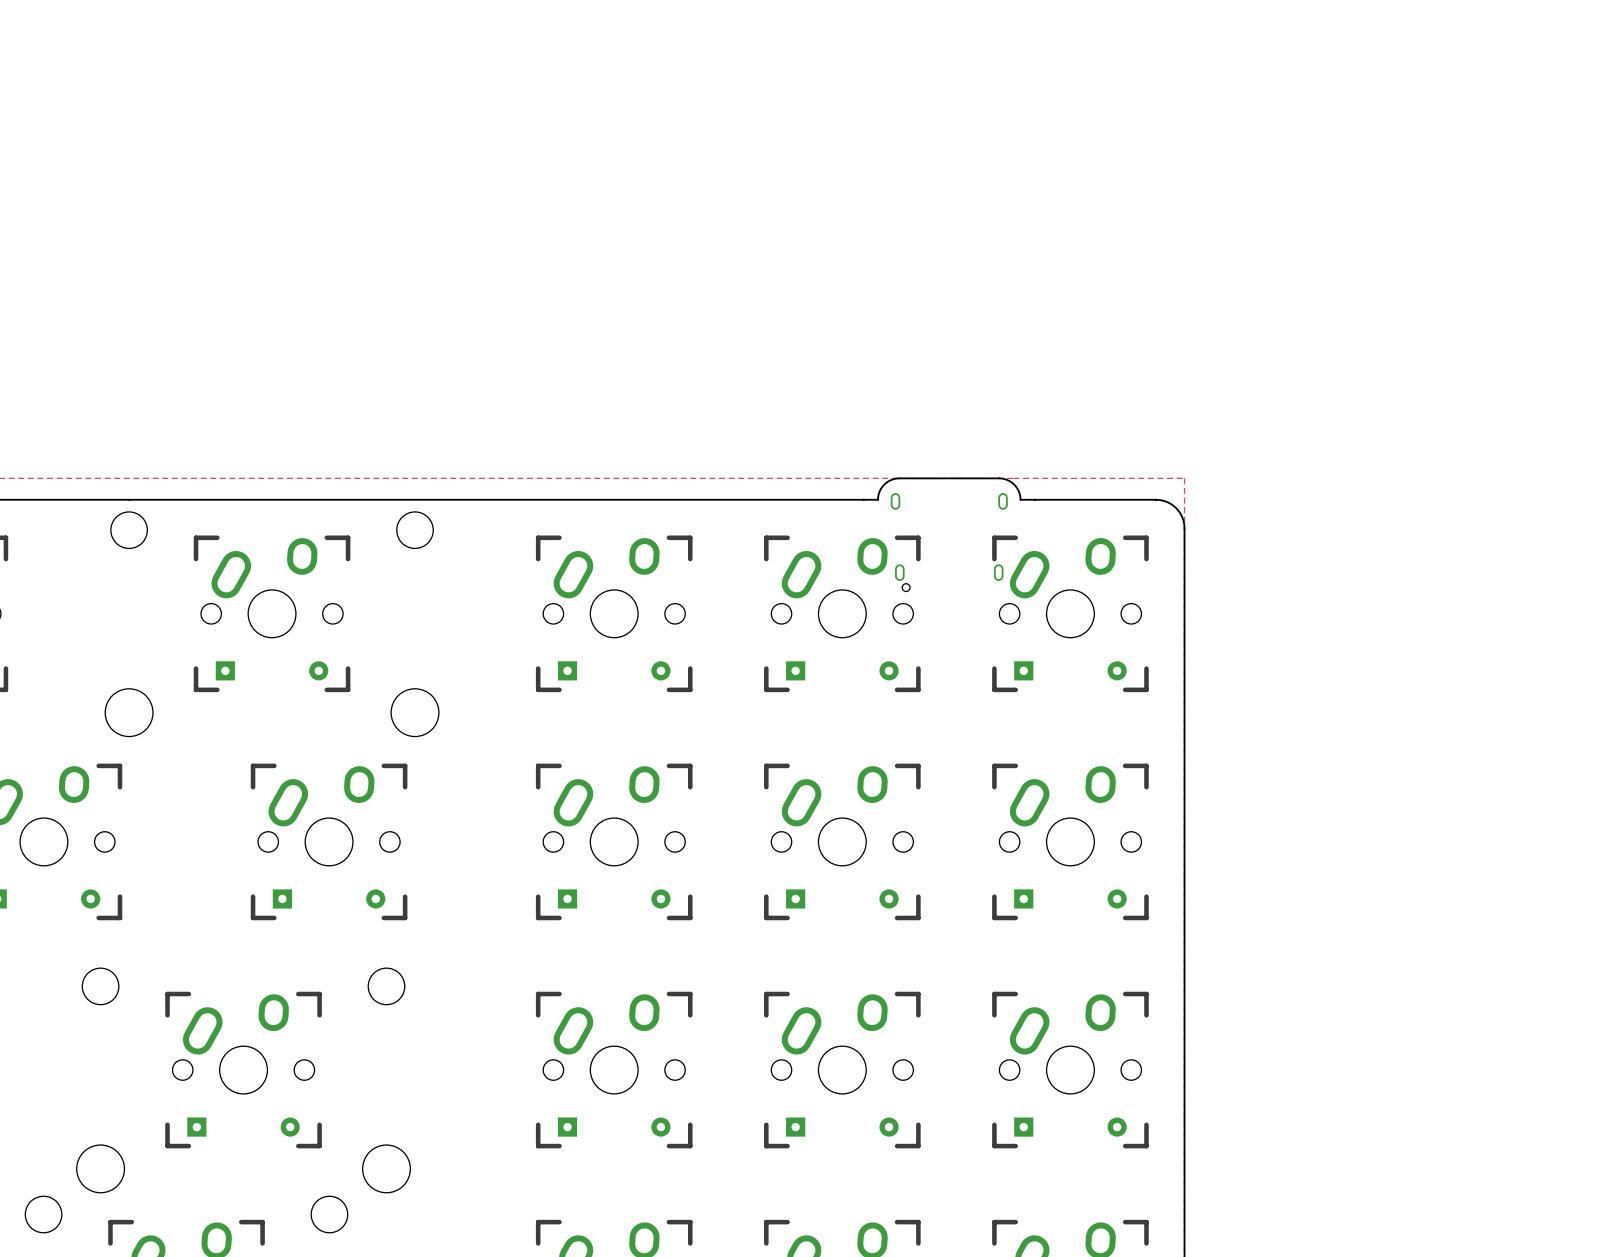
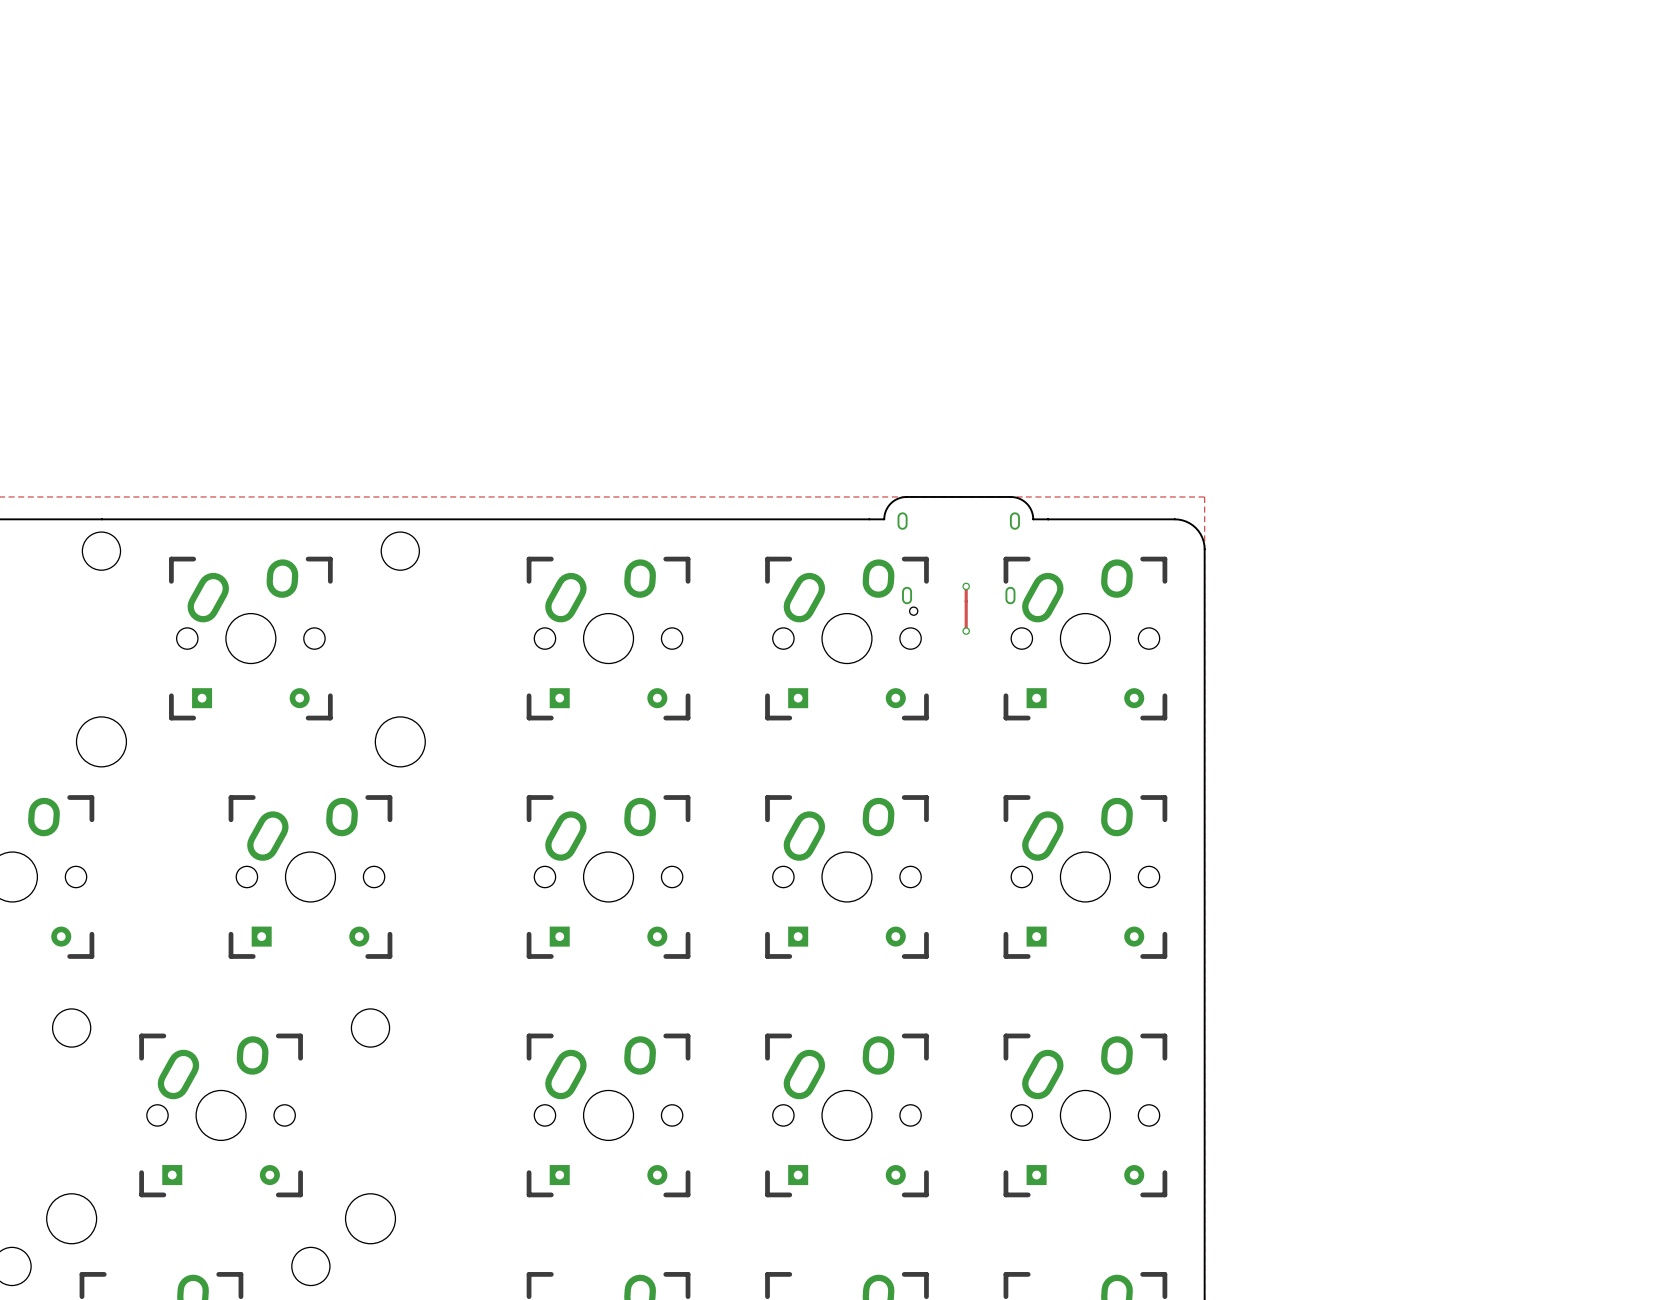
track: none -> (966, 586) (966, 631)
via: none -> (966, 586)
via: none -> (966, 631)

